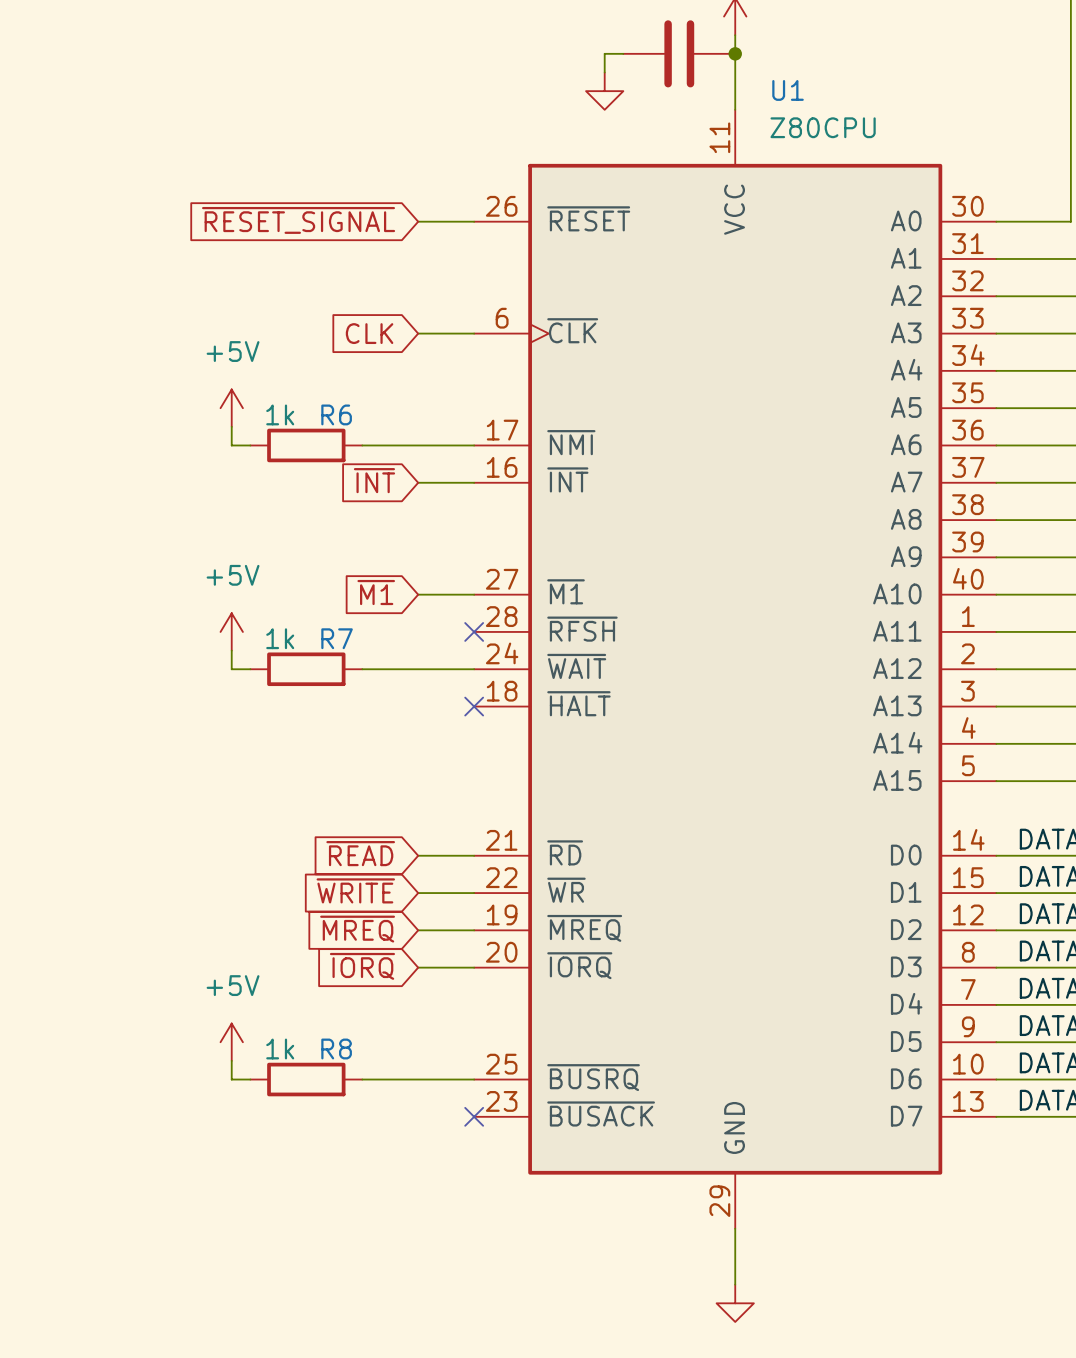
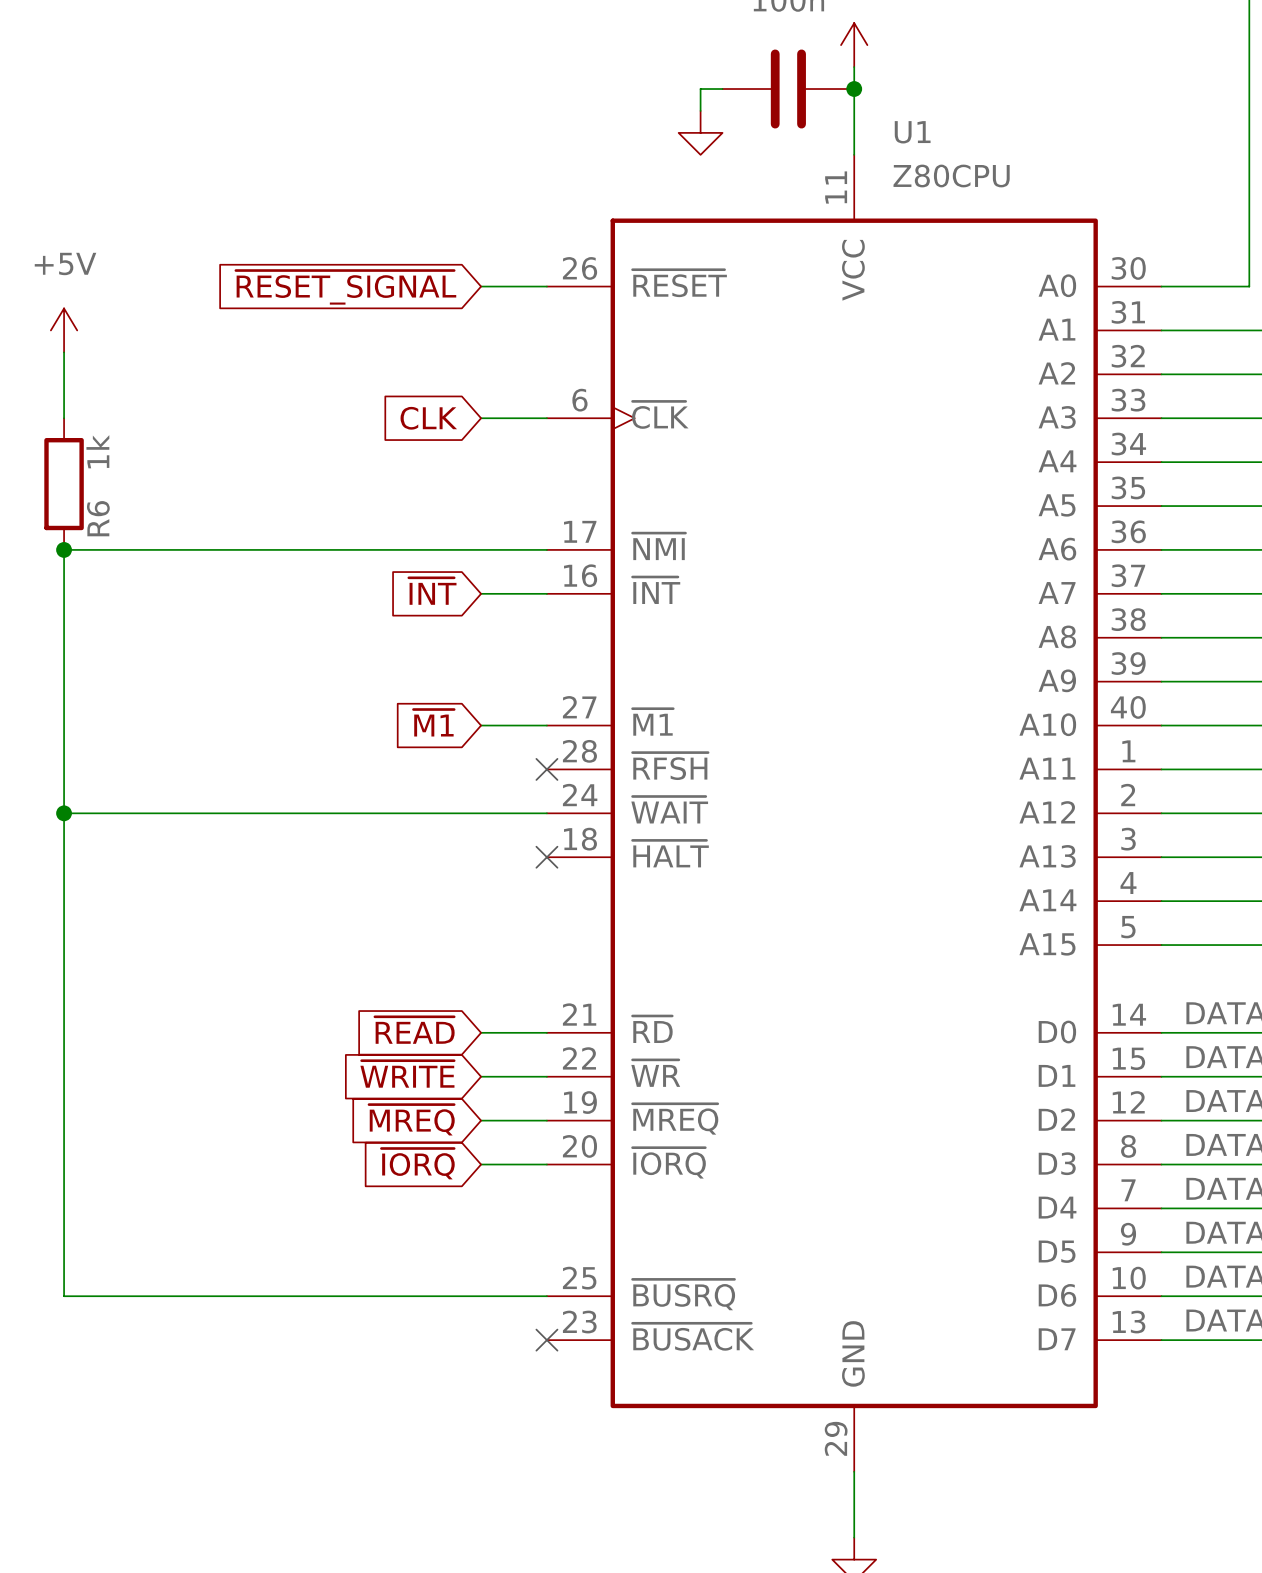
power symbol: none -> +5V (64, 330)
wire: none -> (64, 352) (64, 418)
power symbol: +5V (231, 408) -> none
wire: (231, 426) (231, 445) -> none
junction: none -> (64, 549)
wire: none -> (283, 549) (415, 549)
R6 rotation: 0° (306, 445) -> 90° clockwise (64, 484)
R6 position: (306, 445) -> (64, 484)
power symbol: +5V (231, 631) -> none
wire: (231, 650) (231, 669) -> (64, 813) (261, 813)
junction: none -> (64, 813)
wire: none -> (283, 813) (415, 813)
R7: 1k (306, 669) -> none
power symbol: +5V (231, 1042) -> none
wire: (231, 1060) (231, 1079) -> (261, 549) (64, 549) (64, 1296) (261, 1296)
wire: none -> (283, 1296) (415, 1296)
R8: 1k (306, 1079) -> none

